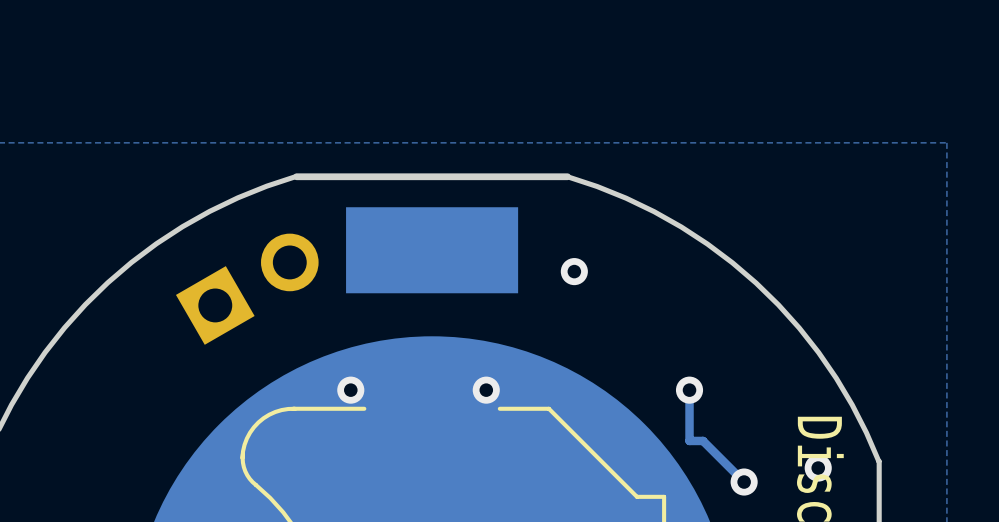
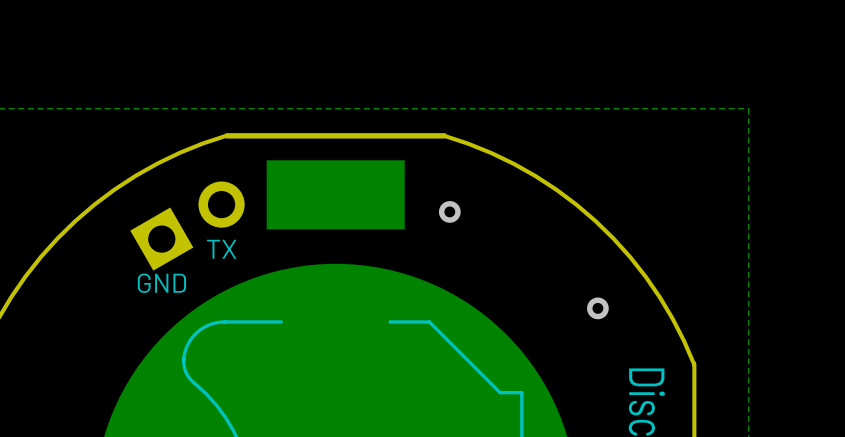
text: none -> TX (221, 249)
text: none -> GND (161, 283)
via: (350, 390) -> none
via: (486, 390) -> none
track: (689, 390) (689, 440) (703, 440) (744, 482) -> none
via: (689, 390) -> none
via: none -> (597, 308)
via: (818, 468) -> none
via: (744, 482) -> none

